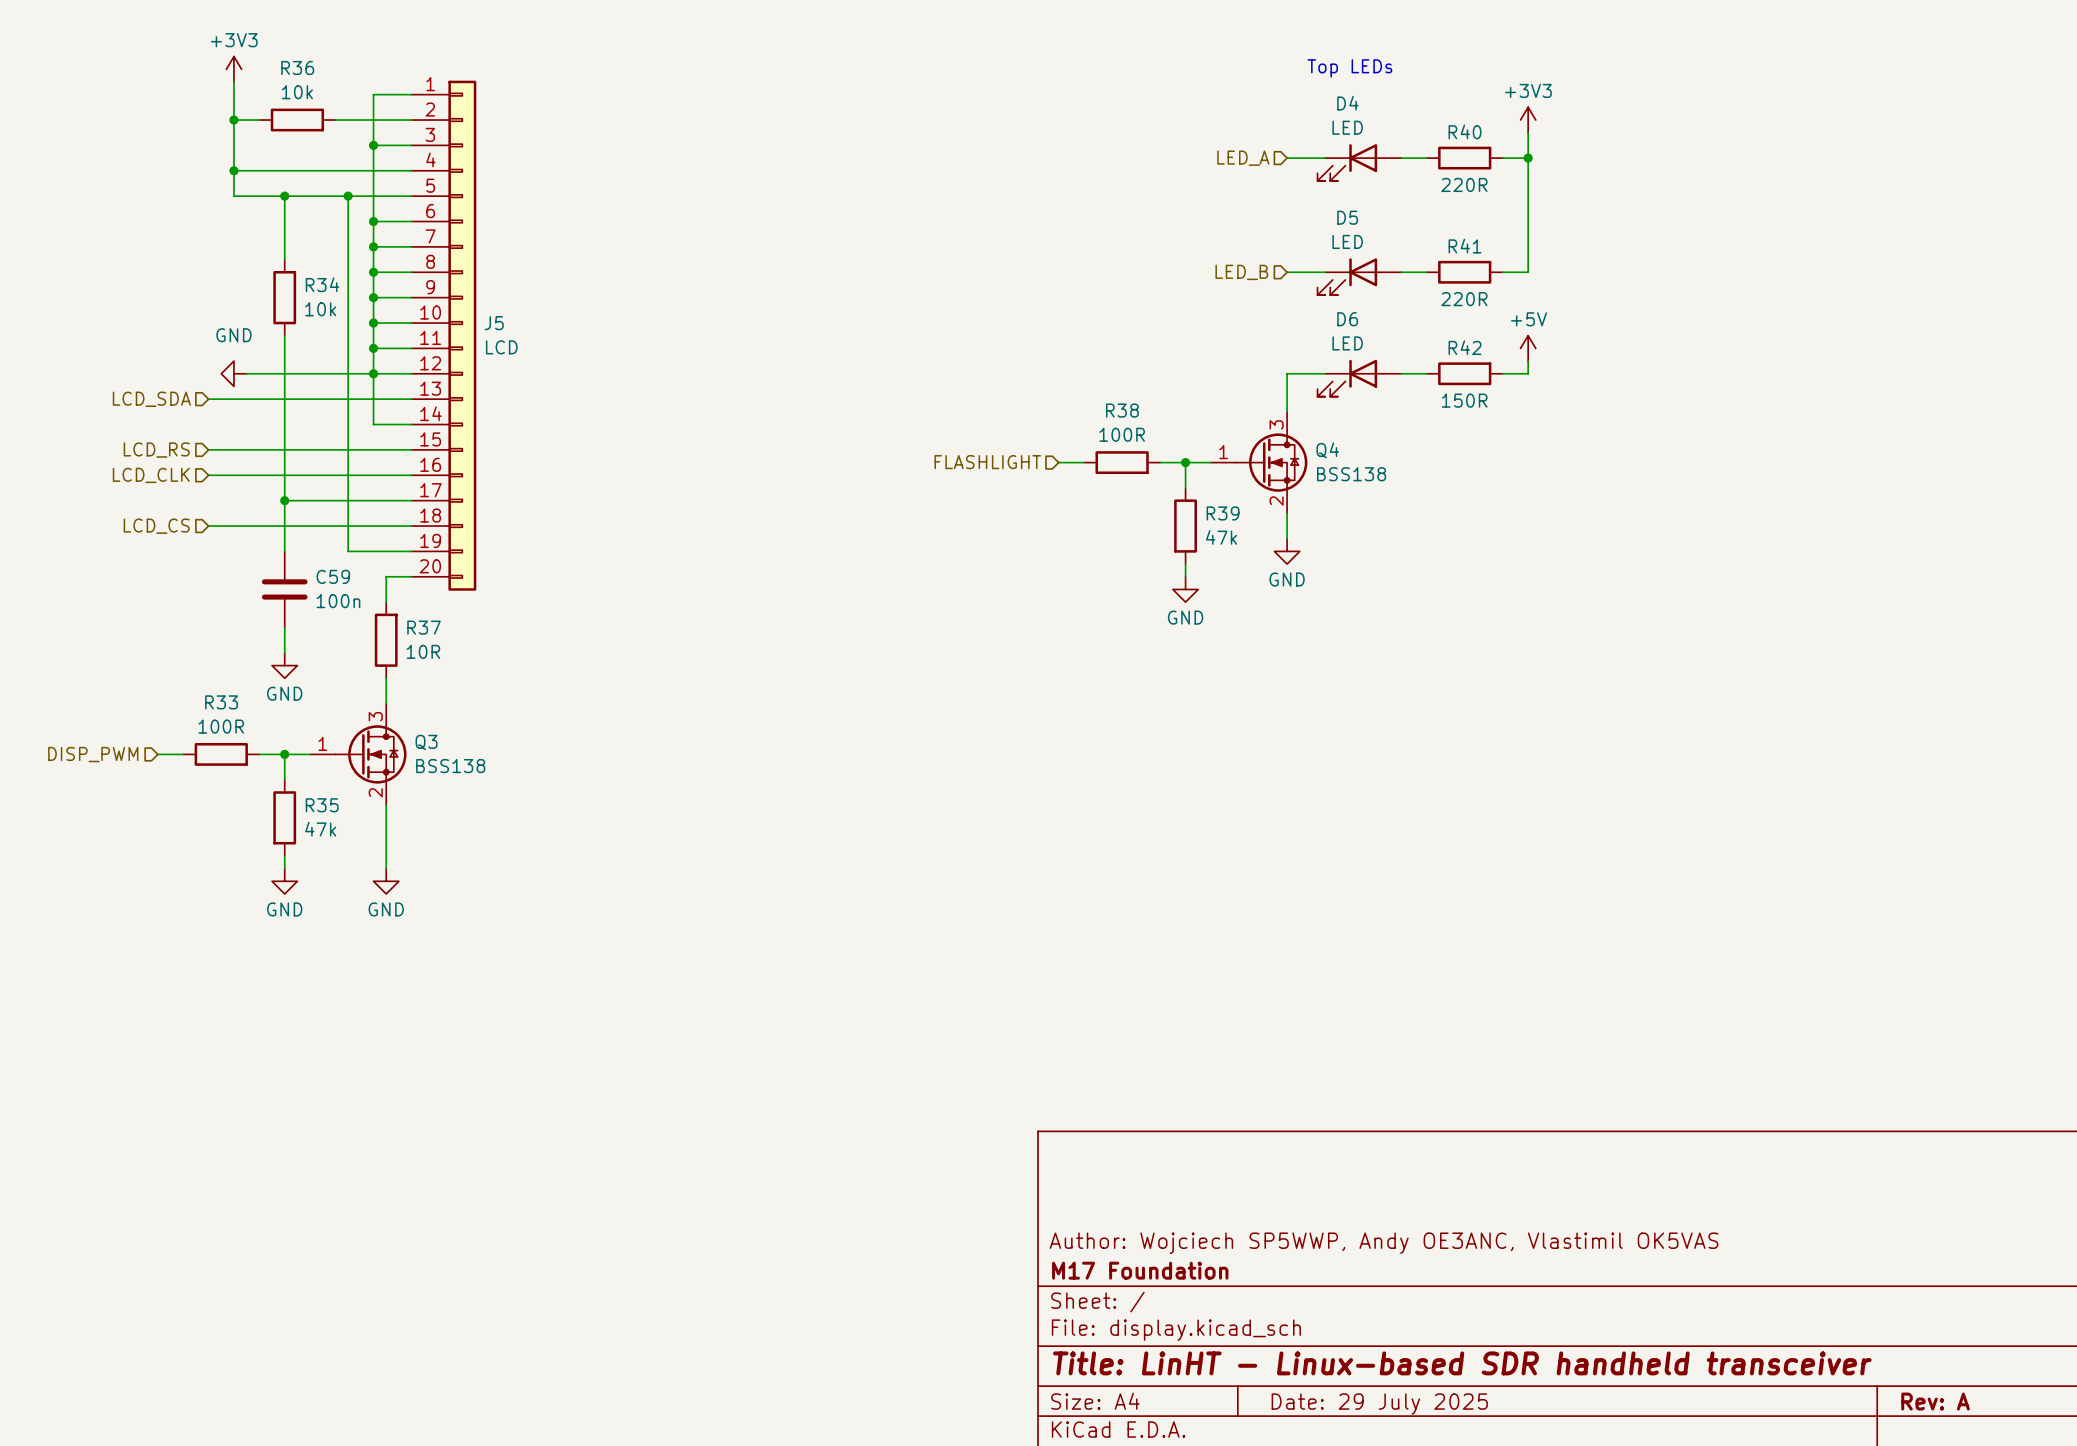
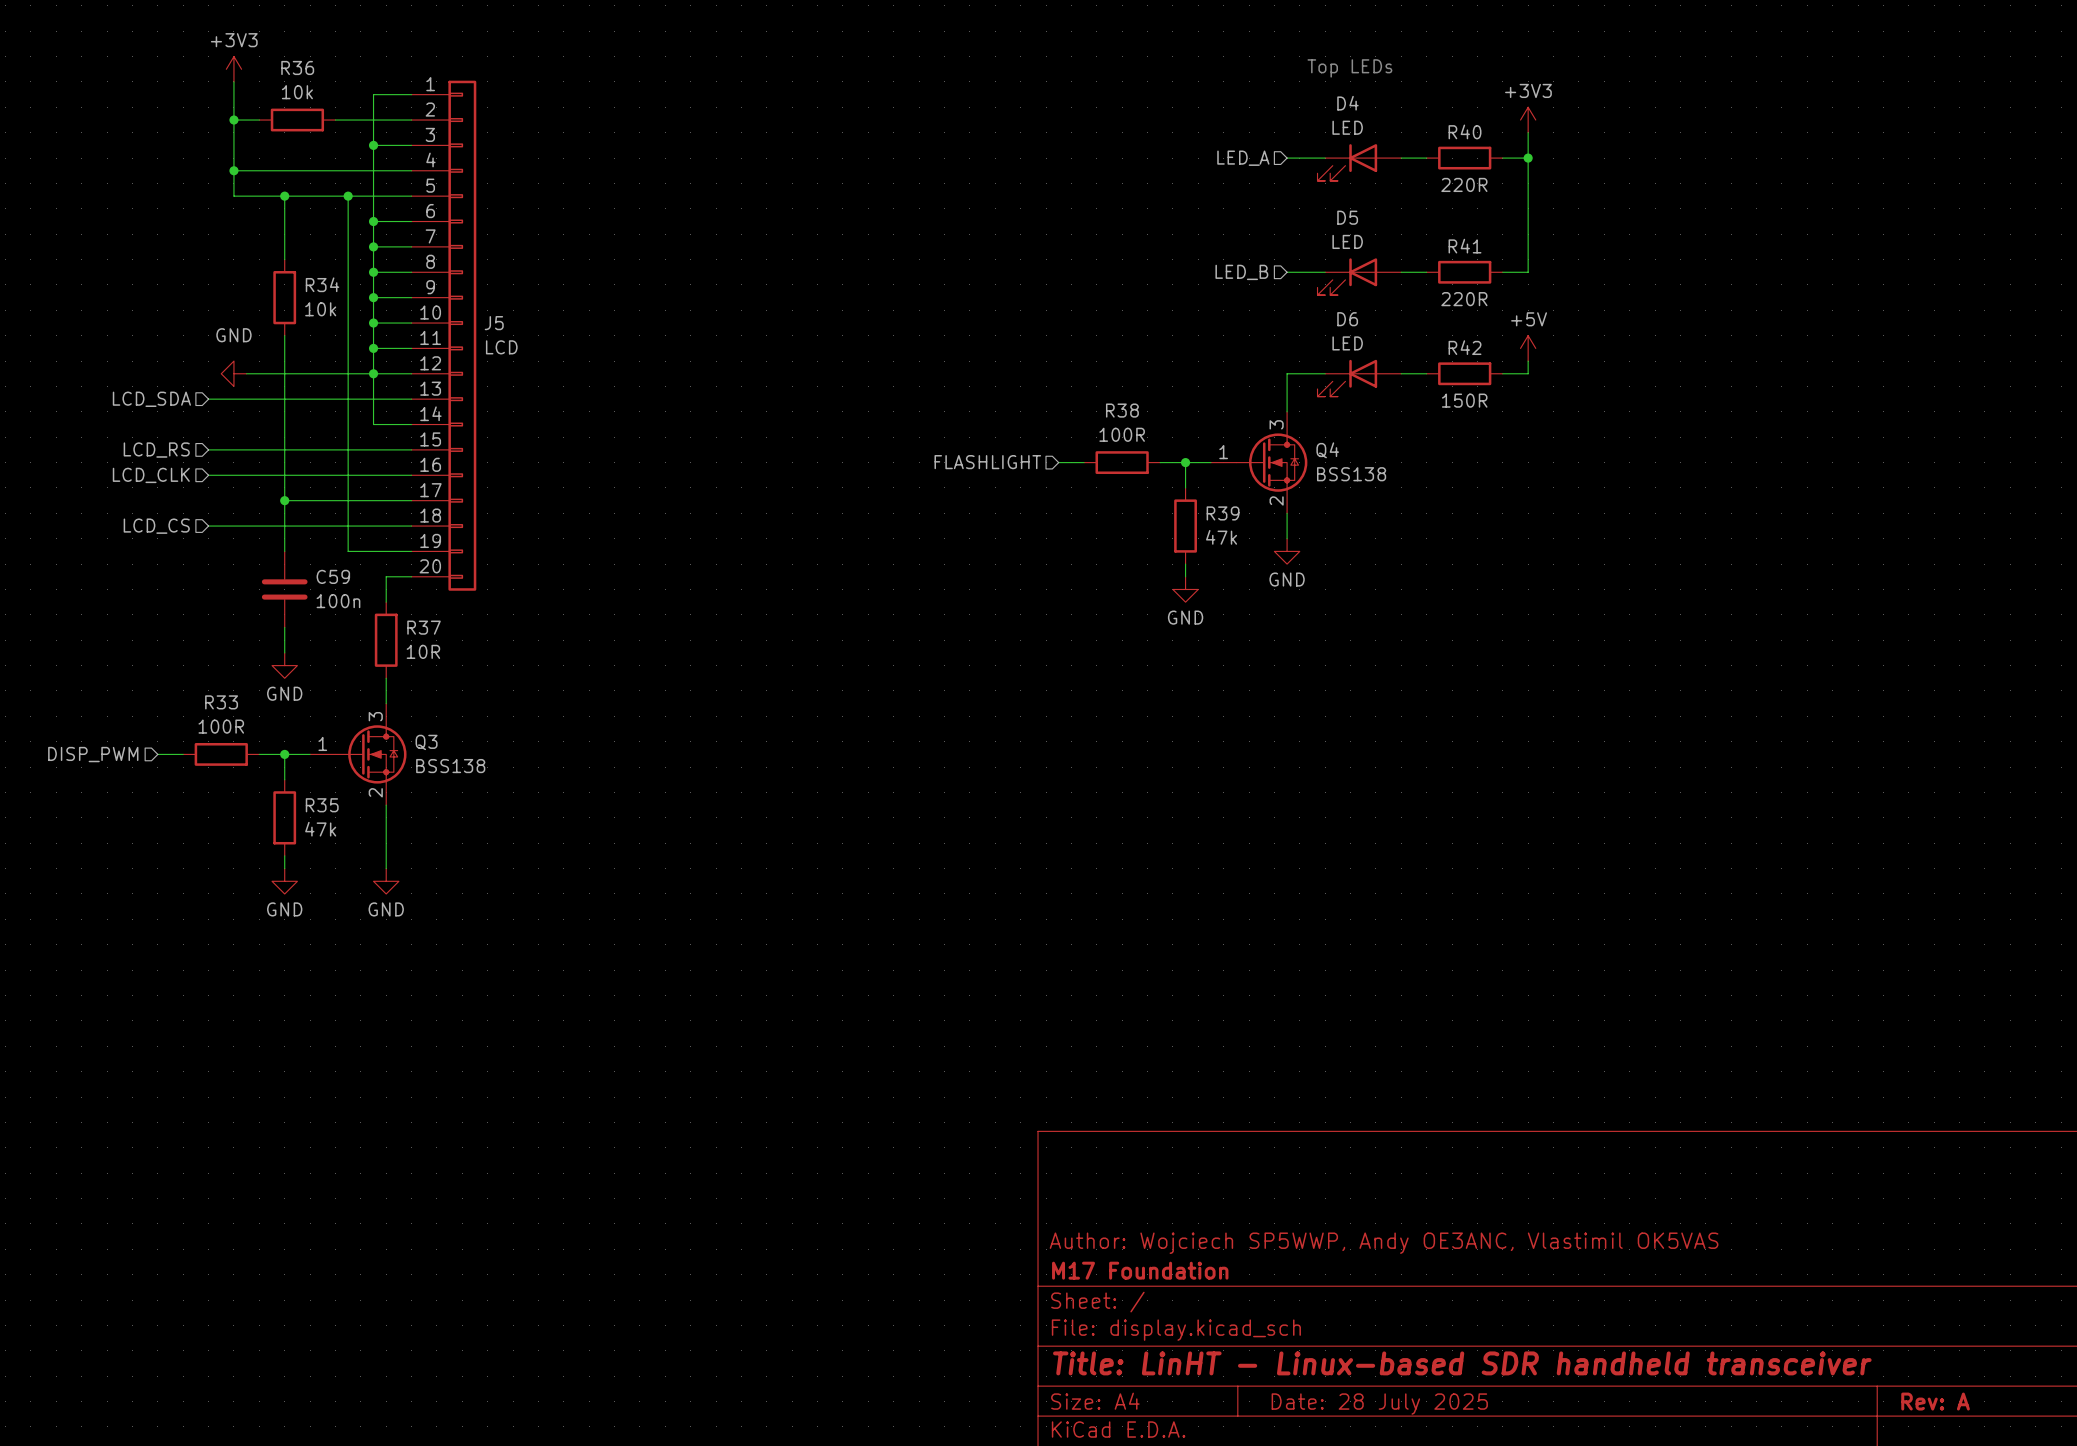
title block: Date: 29 July 2025 (1379, 1404) -> Date: 28 July 2025 (1379, 1404)

